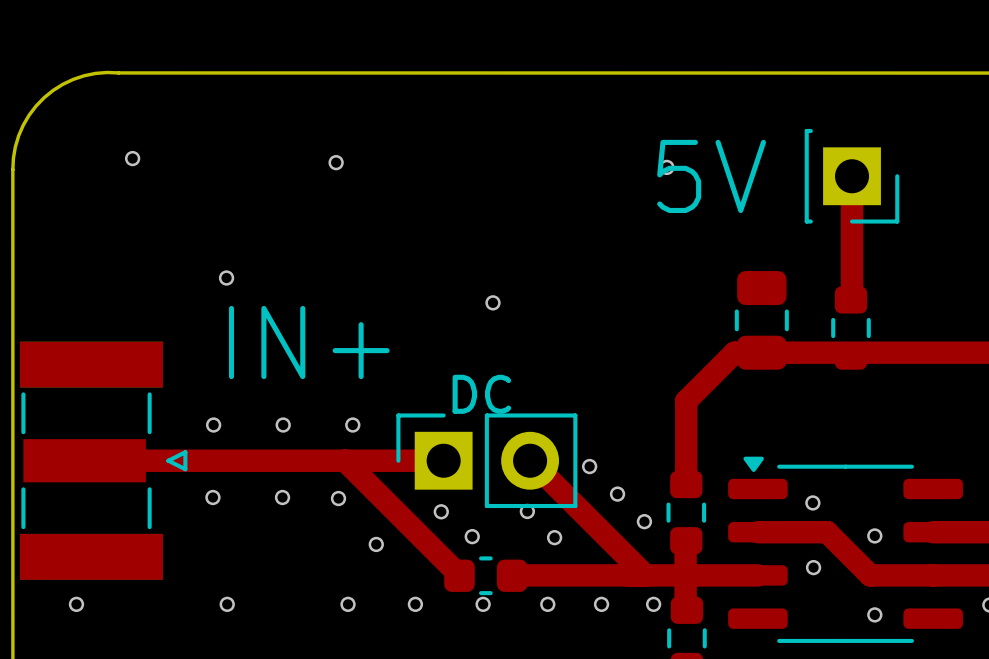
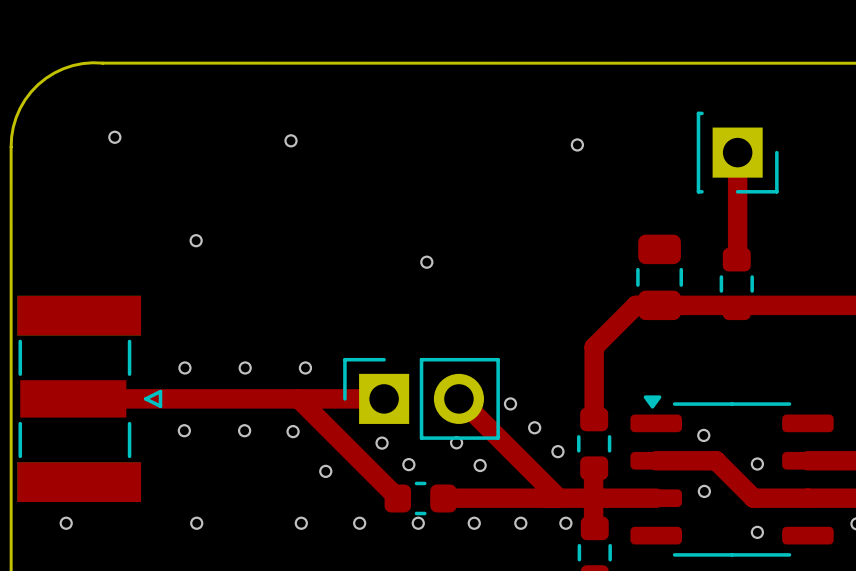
text: 5V (711, 176) -> none
text: IN+ (309, 342) -> none
text: DC (481, 394) -> none

